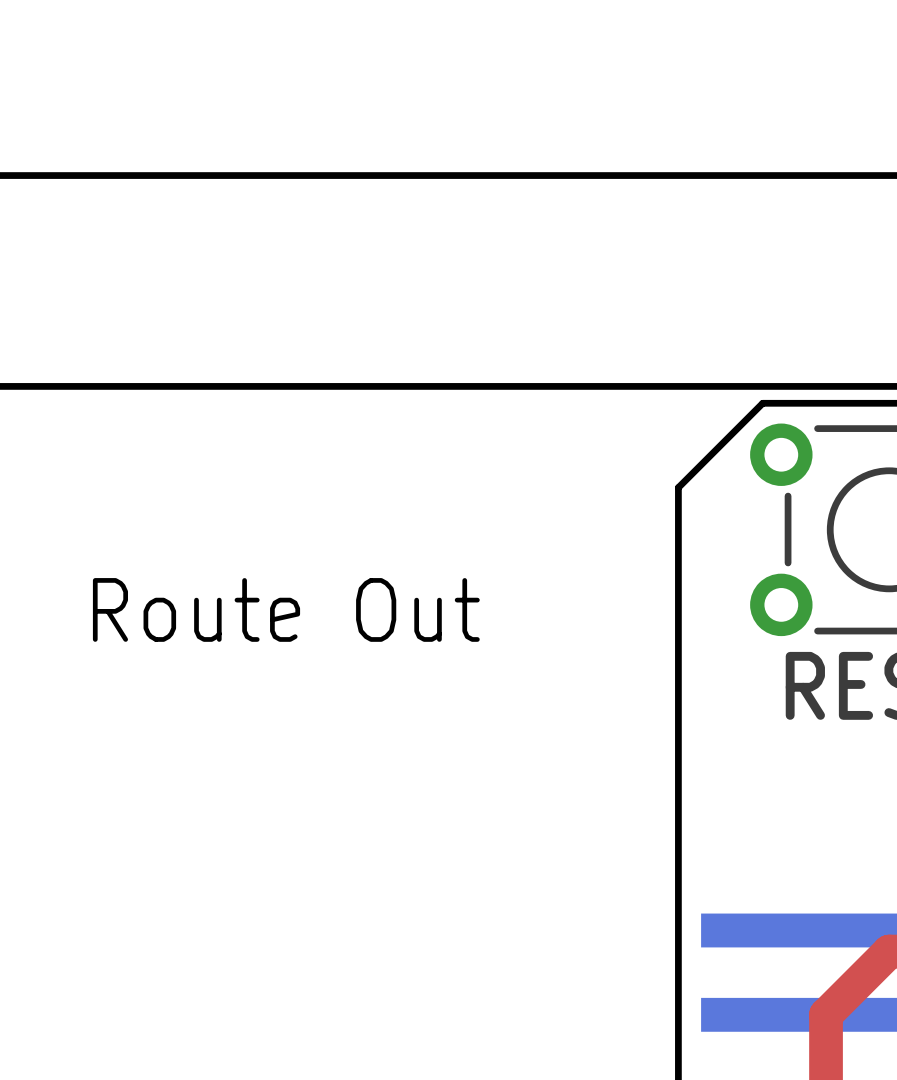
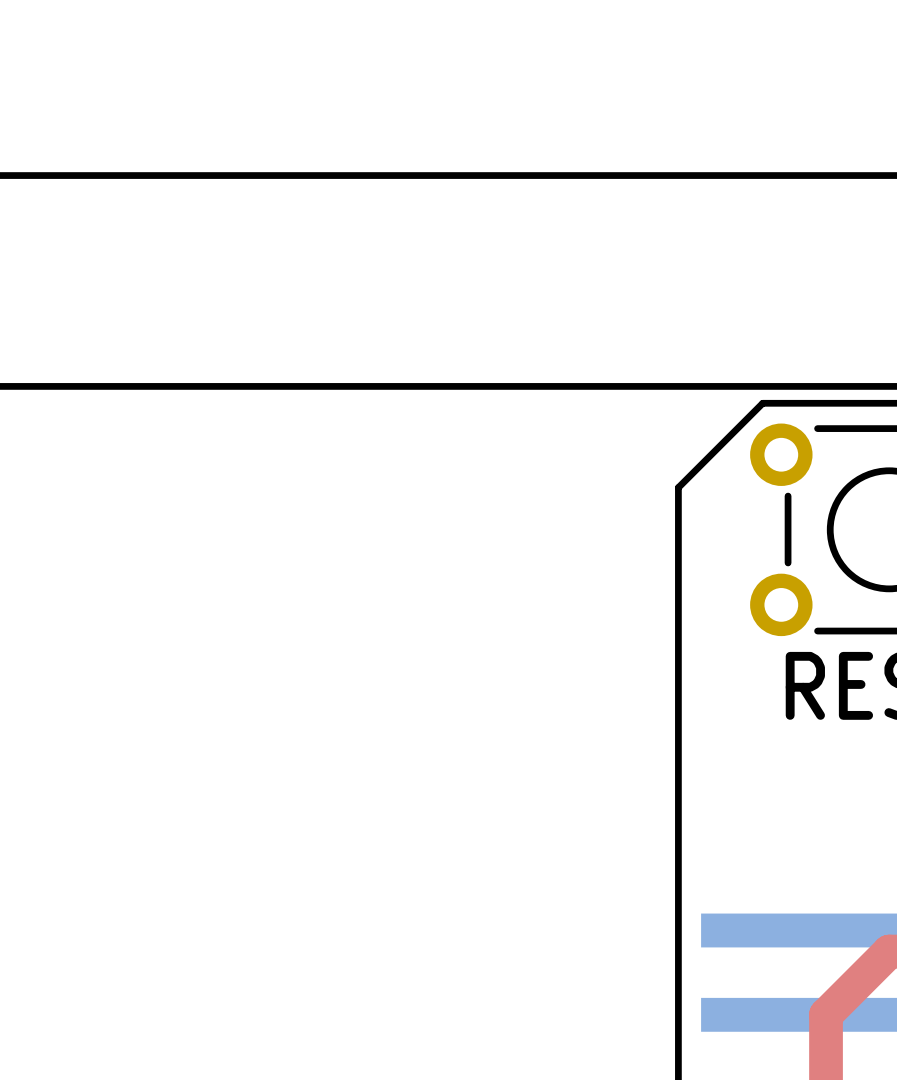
text: Route Out (286, 609) -> none

